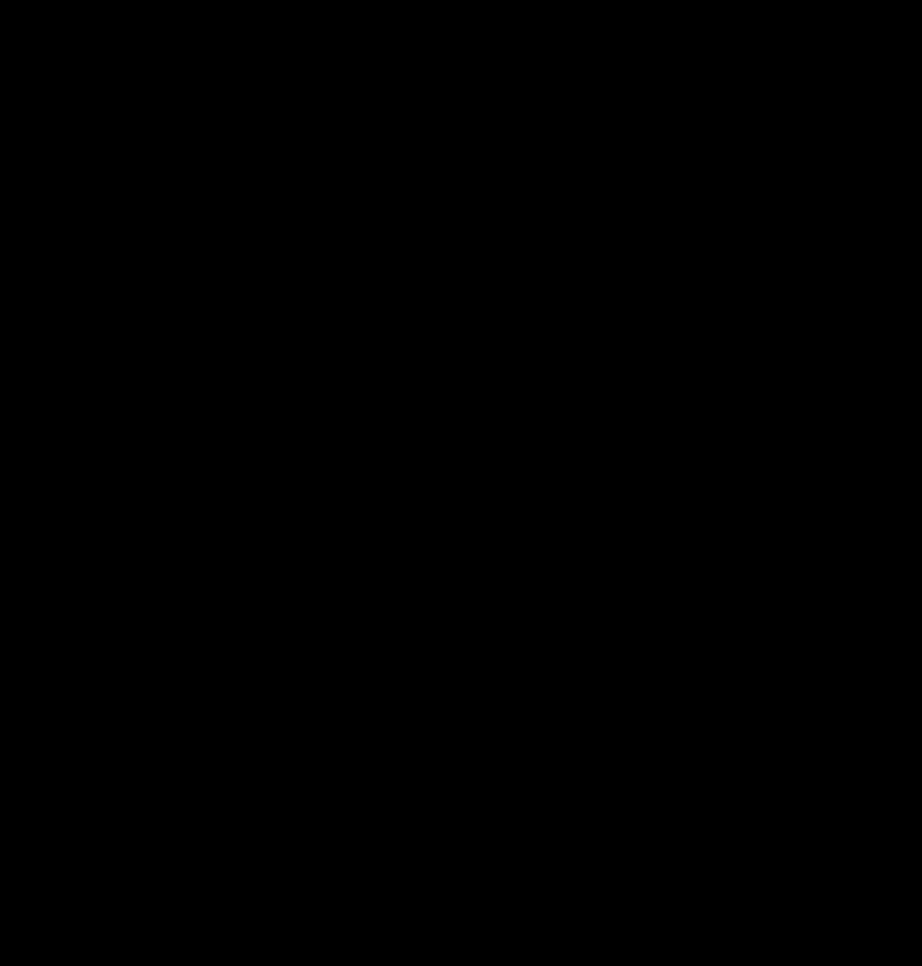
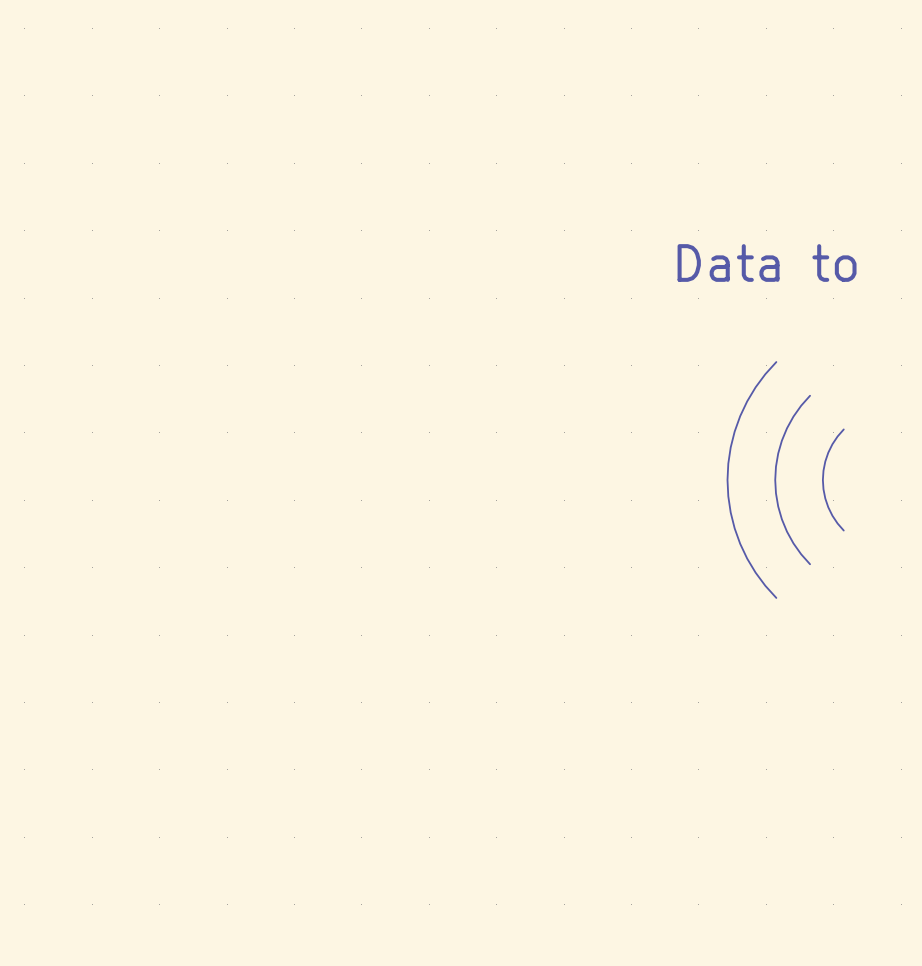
text: none -> Data to (767, 262)
line: none -> (776, 362) (755, 387) (740, 416) (730, 447) (727, 479) (730, 512) (740, 543) (755, 572) (776, 597)
line: none -> (810, 395) (787, 428) (778, 453) (775, 479) (781, 519) (793, 543) (810, 564)
line: none -> (843, 429) (828, 452) (822, 479) (828, 507) (843, 530)

